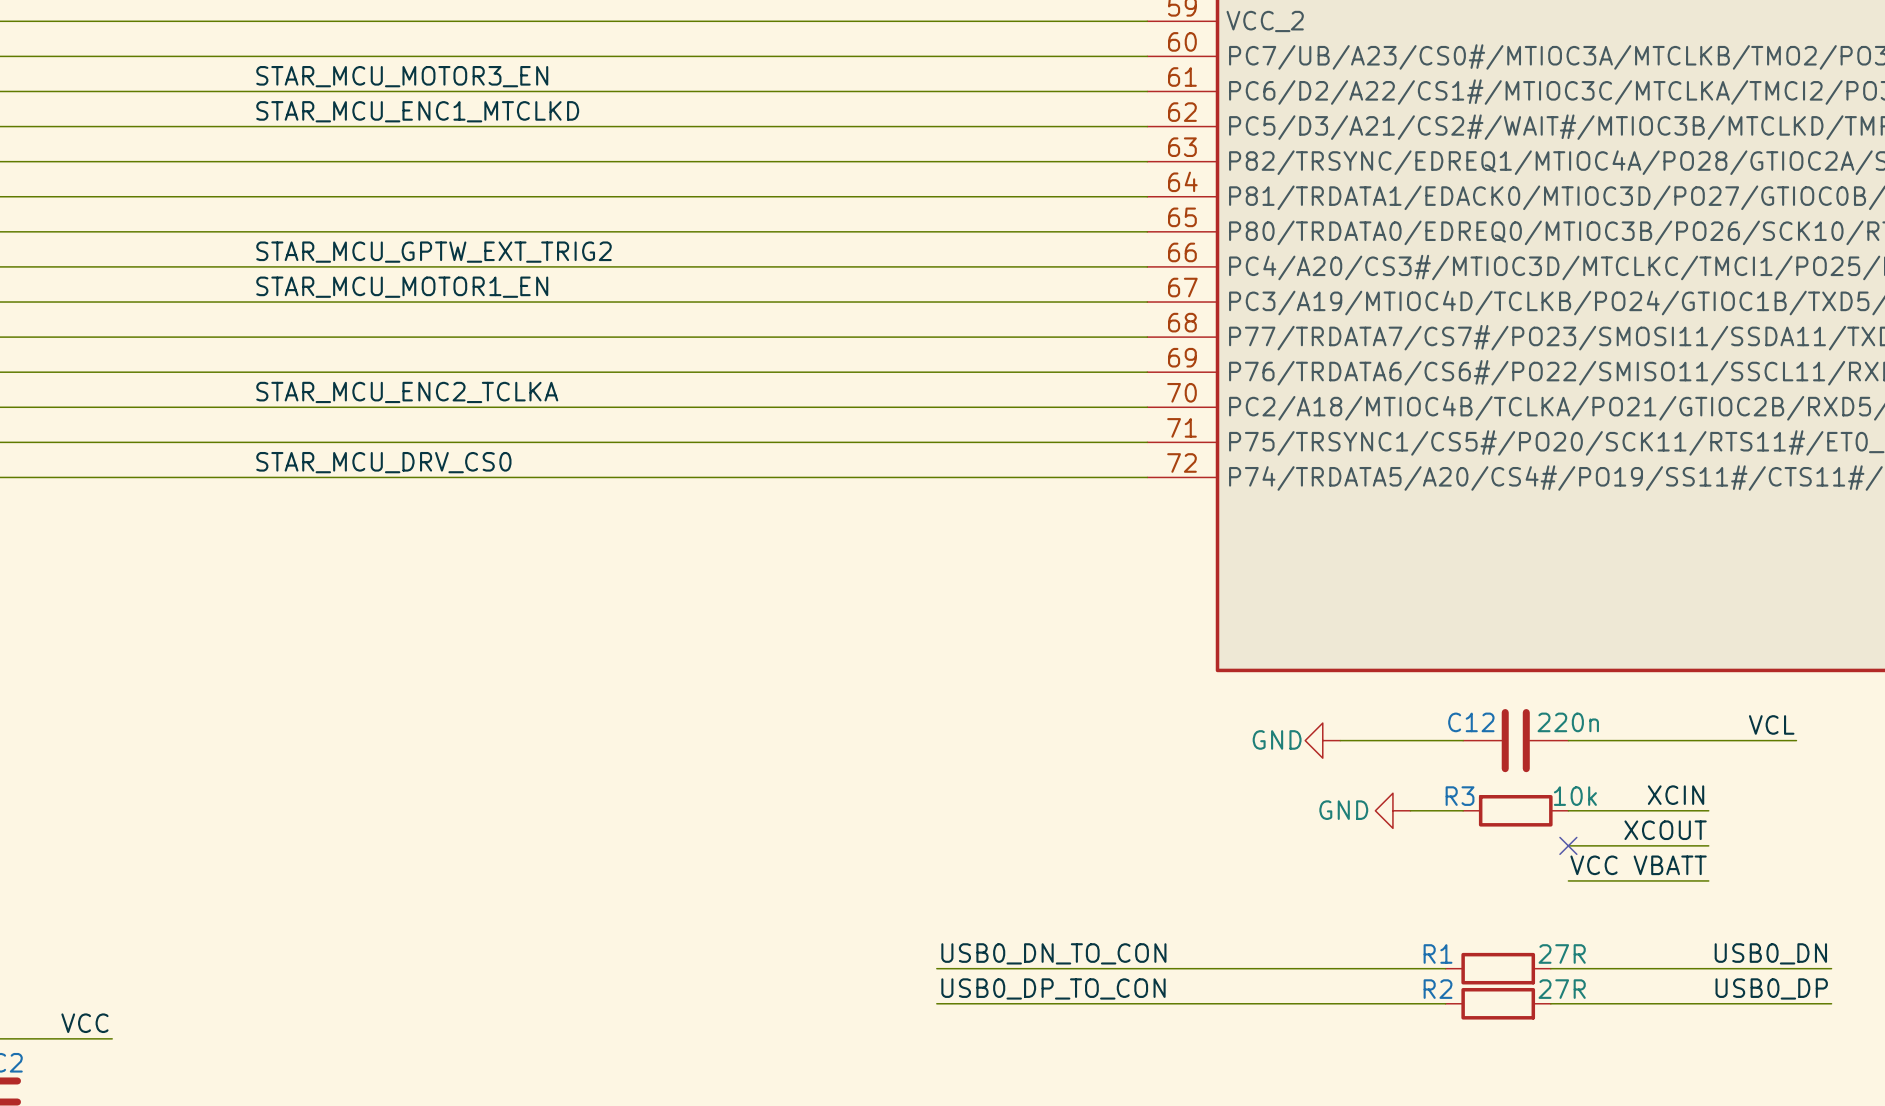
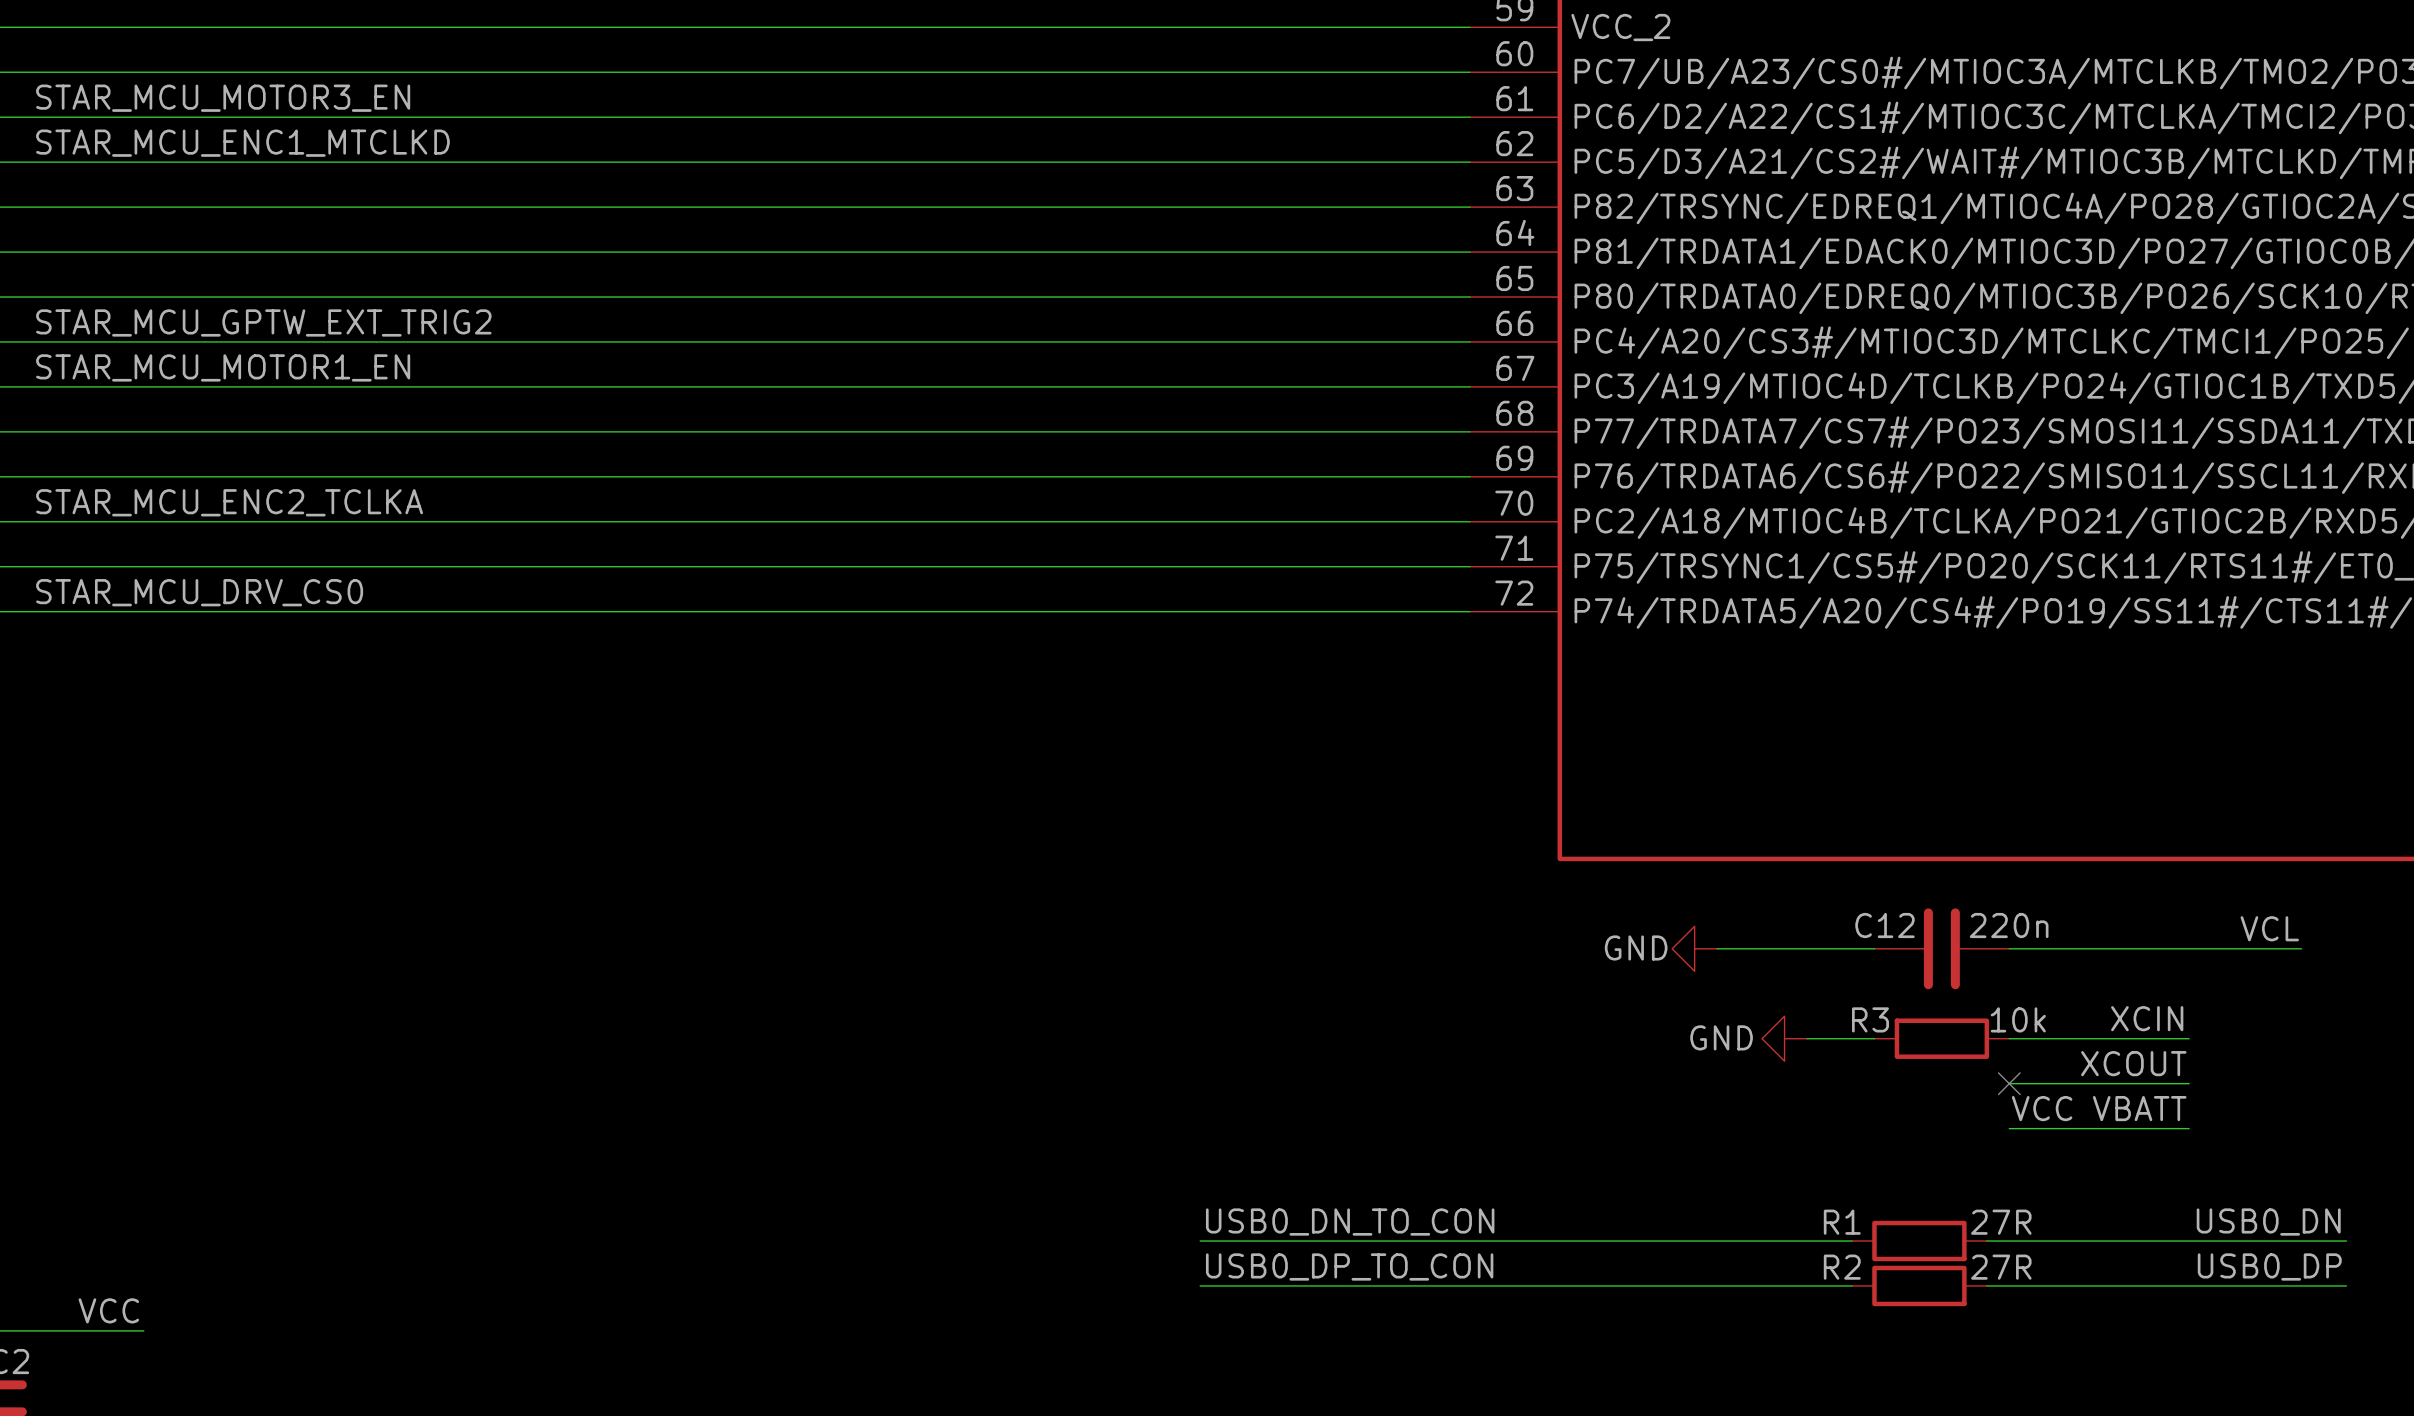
label position: STAR_MCU_MOTOR3_EN (402, 76) -> STAR_MCU_MOTOR3_EN (223, 98)
label position: STAR_MCU_ENC1_MTCLKD (417, 111) -> STAR_MCU_ENC1_MTCLKD (242, 143)
label position: STAR_MCU_GPTW_EXT_TRIG2 (434, 252) -> STAR_MCU_GPTW_EXT_TRIG2 (263, 322)
label position: STAR_MCU_MOTOR1_EN (402, 287) -> STAR_MCU_MOTOR1_EN (223, 367)
label position: STAR_MCU_ENC2_TCLKA (407, 392) -> STAR_MCU_ENC2_TCLKA (229, 502)
label position: STAR_MCU_DRV_CS0 (383, 462) -> STAR_MCU_DRV_CS0 (199, 592)

